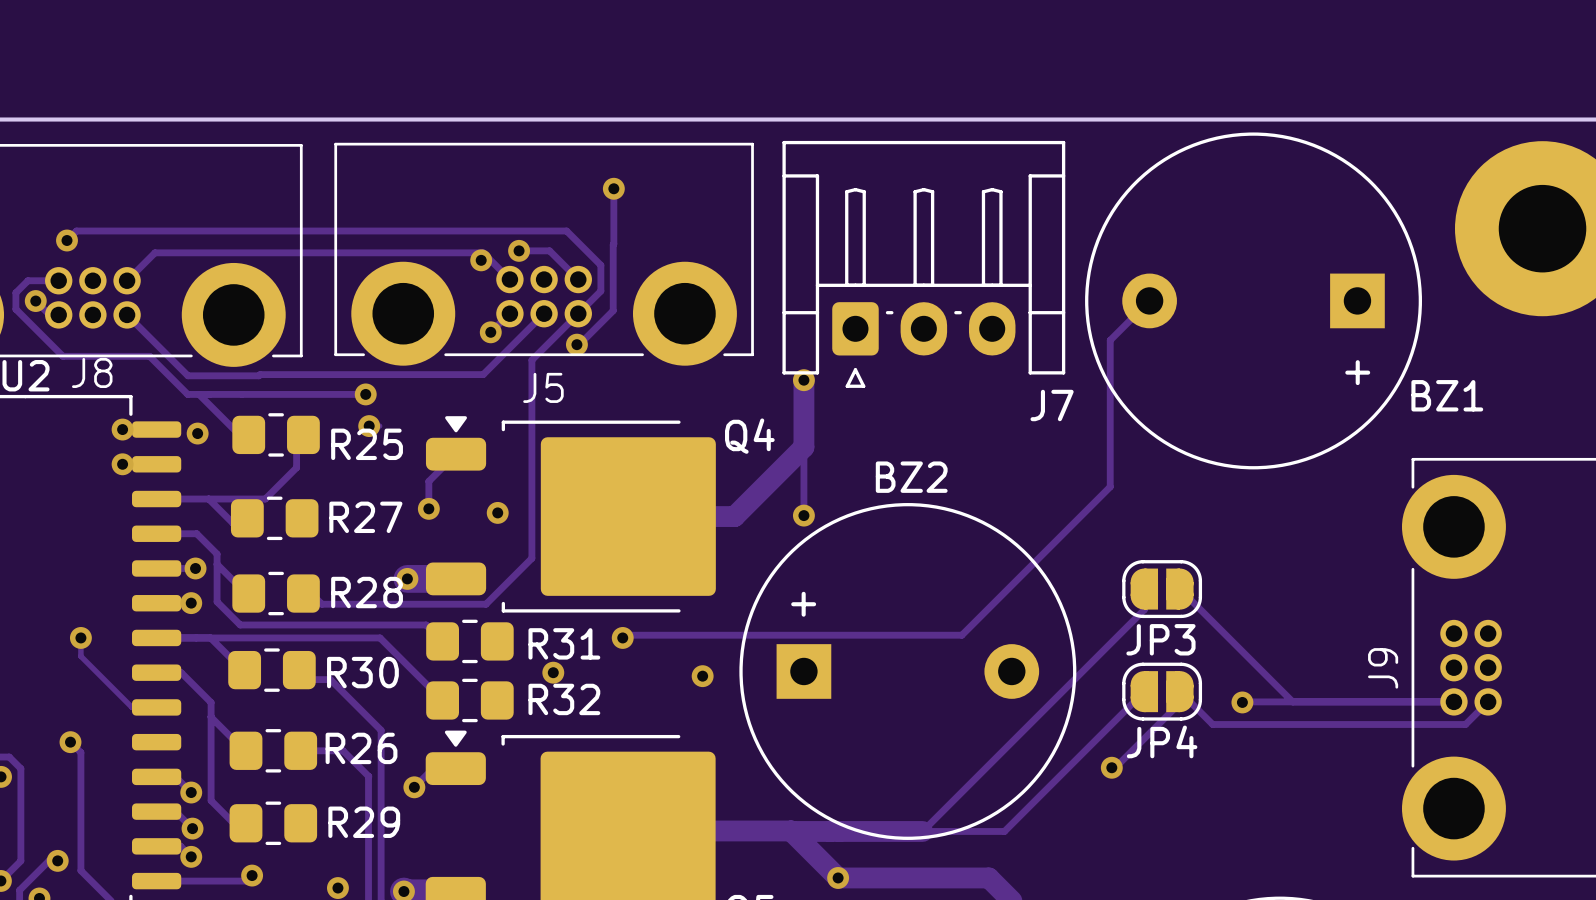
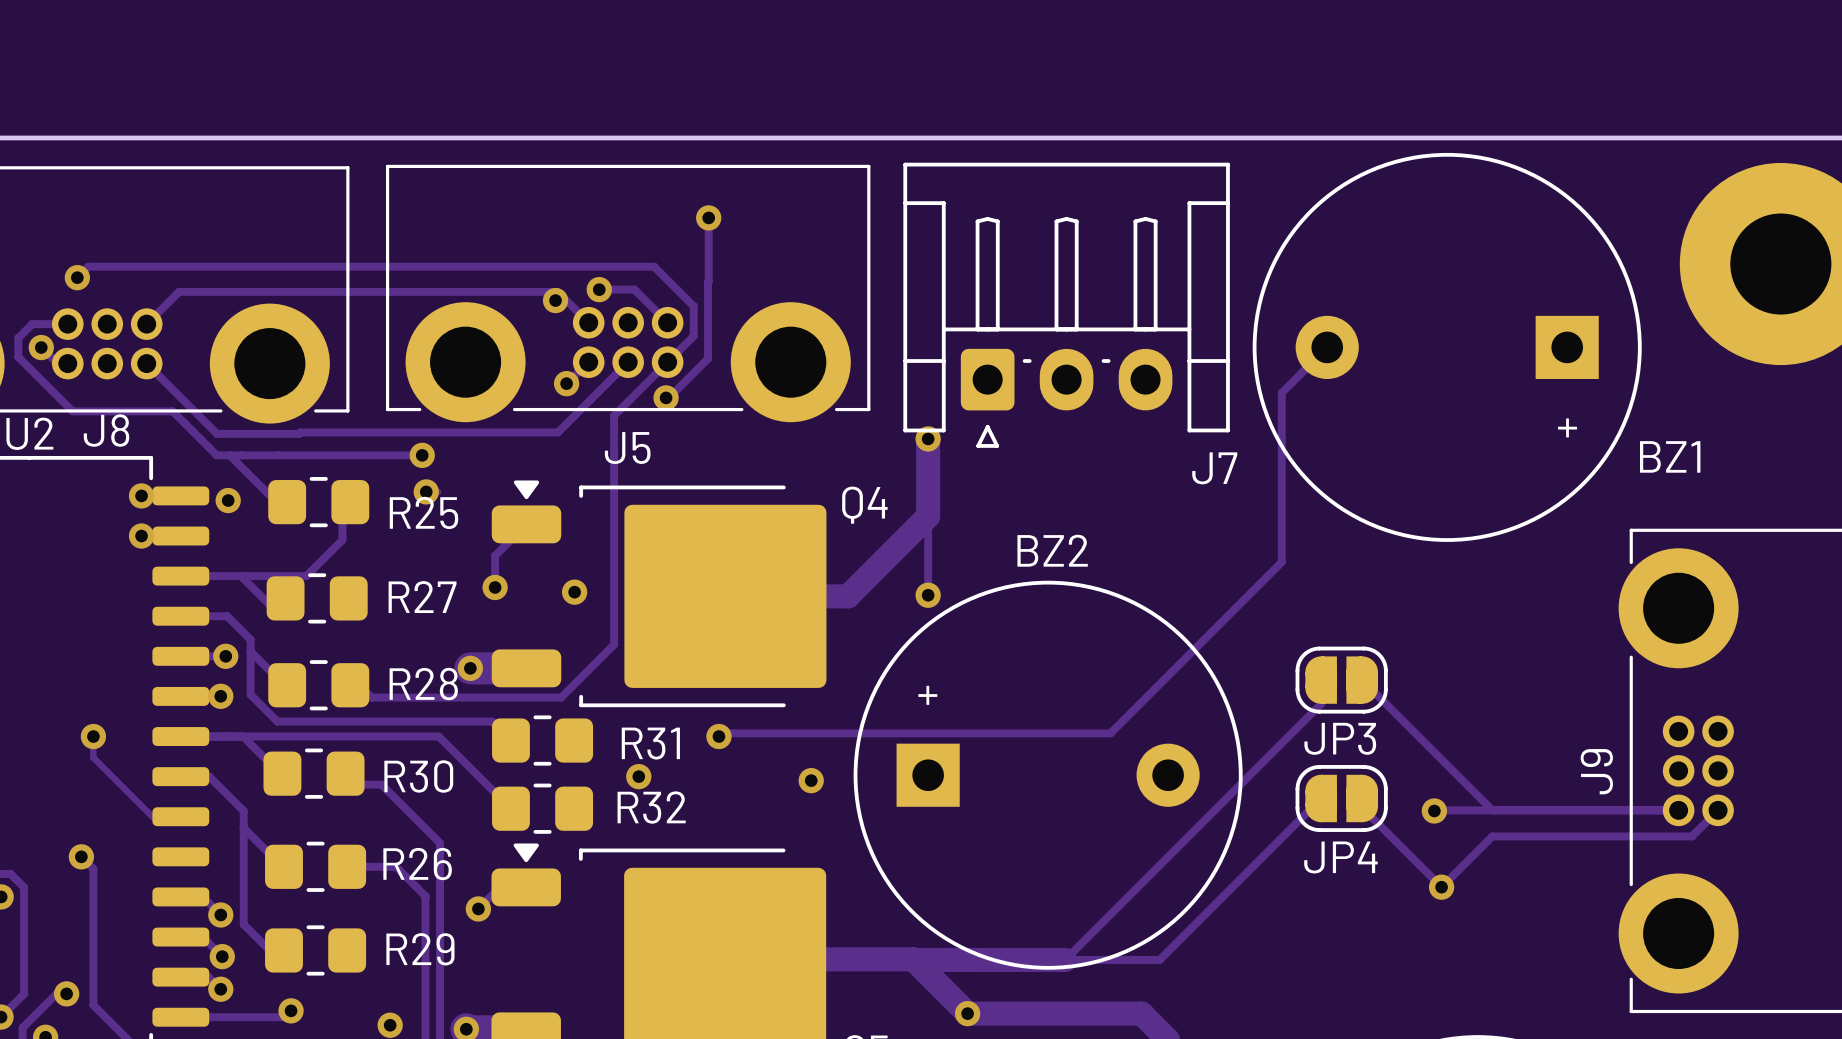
track: (1179, 691) (1212, 724) (1292, 724) -> (1362, 807) (1441, 887) (1492, 836)
track: (1179, 699) (1179, 703) (1115, 767) (1111, 767) -> none
via position: (1111, 767) -> (1441, 887)

